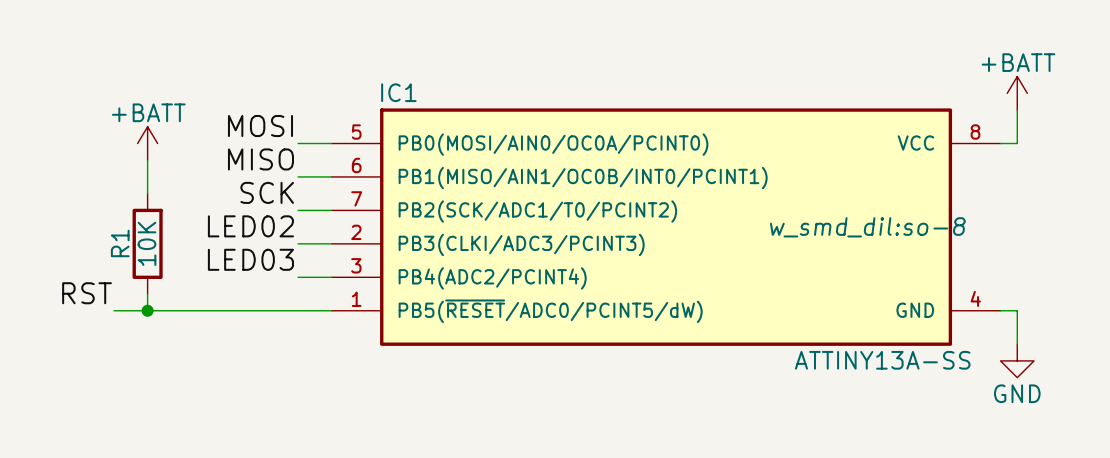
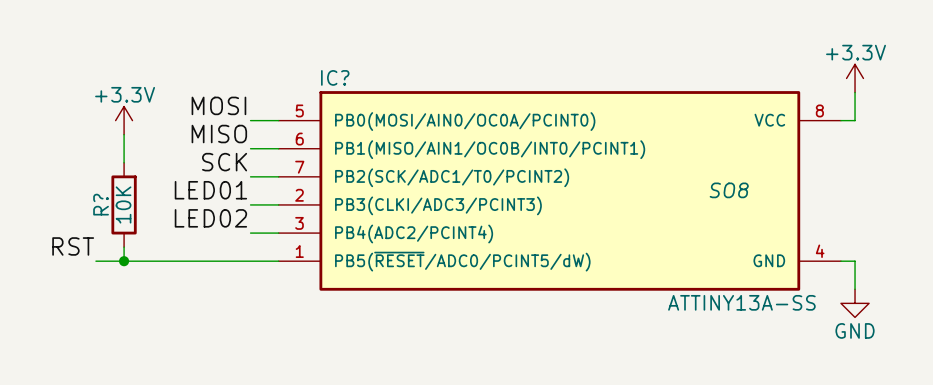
IC1 name: IC1 (398, 92) -> IC? (335, 77)
power symbol: +BATT (1017, 93) -> +3.3V (855, 78)
power symbol: +BATT (147, 143) -> +3.3V (124, 120)
label: LED02 (250, 226) -> LED01 (210, 190)
IC1 text: w_smd_dil:so-8 (867, 227) -> SO8 (729, 190)
R1 name: R1 (120, 243) -> R? (101, 204)
label: LED03 (250, 259) -> LED02 (210, 218)

